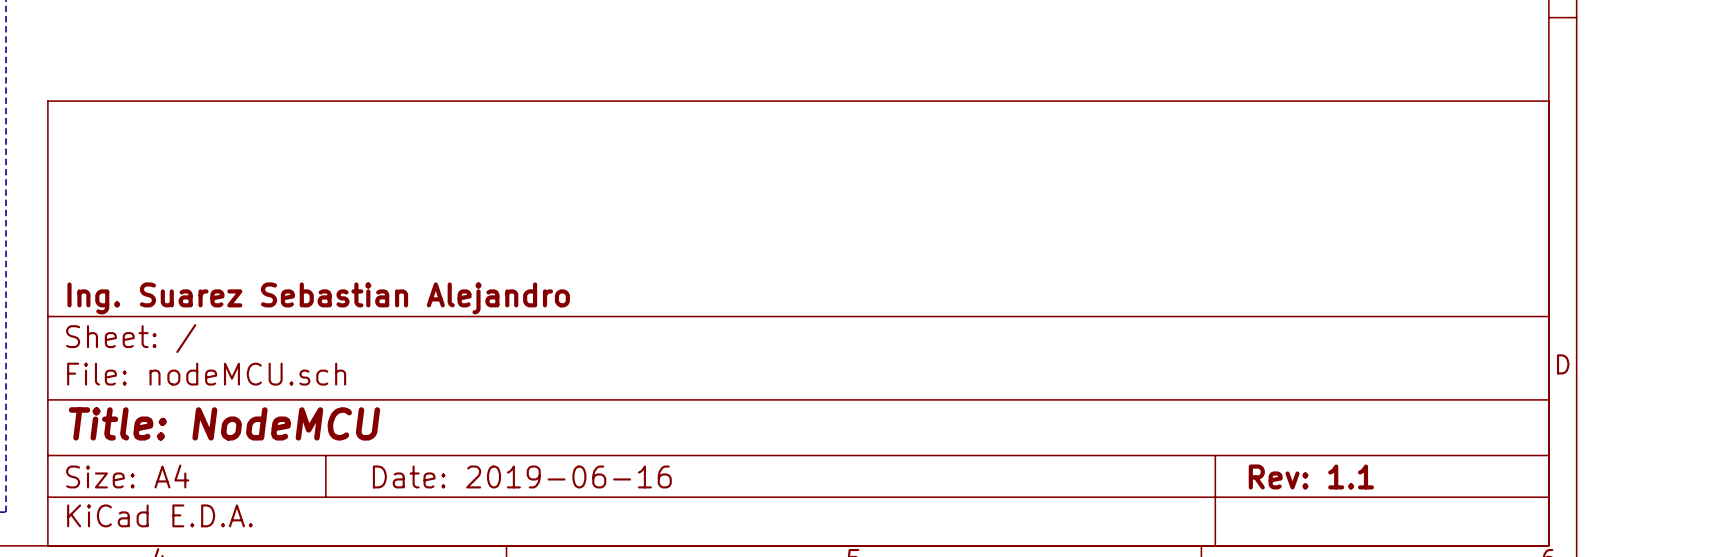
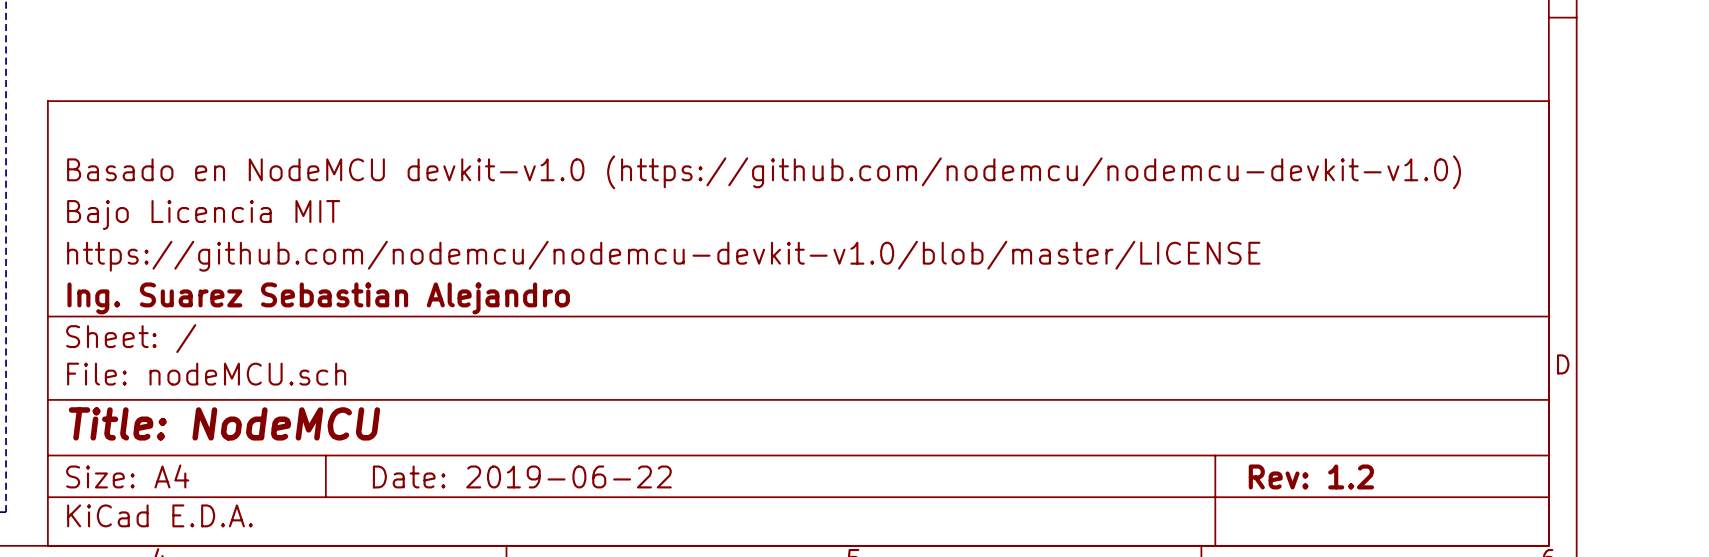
title block: none -> Basado en NodeMCU devkit-v1.0 (https://github.com/nodemcu/nodemcu-devkit-v1.0) (764, 172)
title block: none -> Bajo Licencia MIT (203, 214)
title block: none -> https://github.com/nodemcu/nodemcu-devkit-v1.0/blob/master/LICENSE (663, 256)
title block: Date: 2019-06-16 (522, 476) -> Date: 2019-06-22 (522, 476)
title block: Rev: 1.1 (1311, 476) -> Rev: 1.2 (1311, 476)

